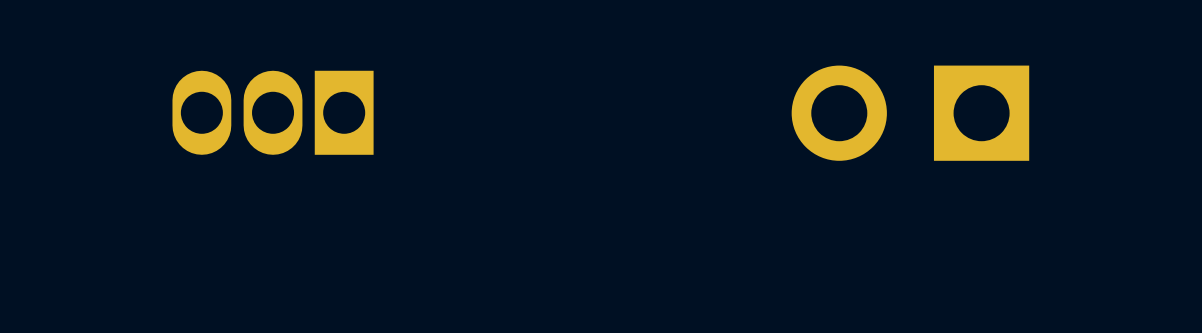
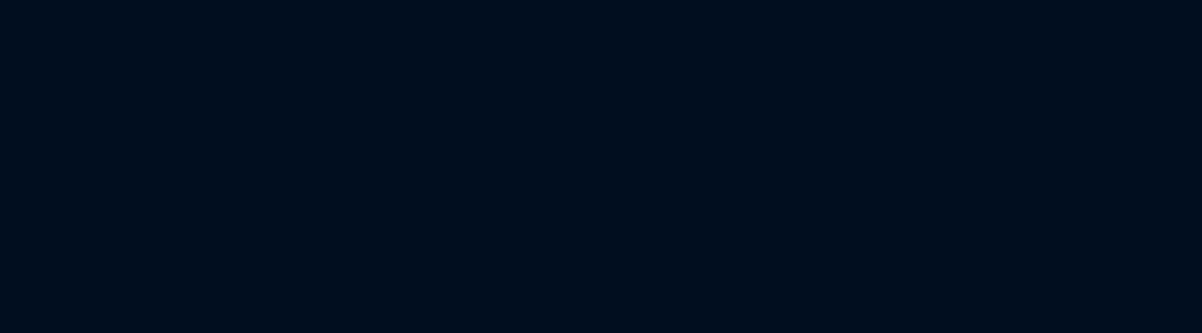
part: (273, 112) -> none
part: (910, 113) -> none

